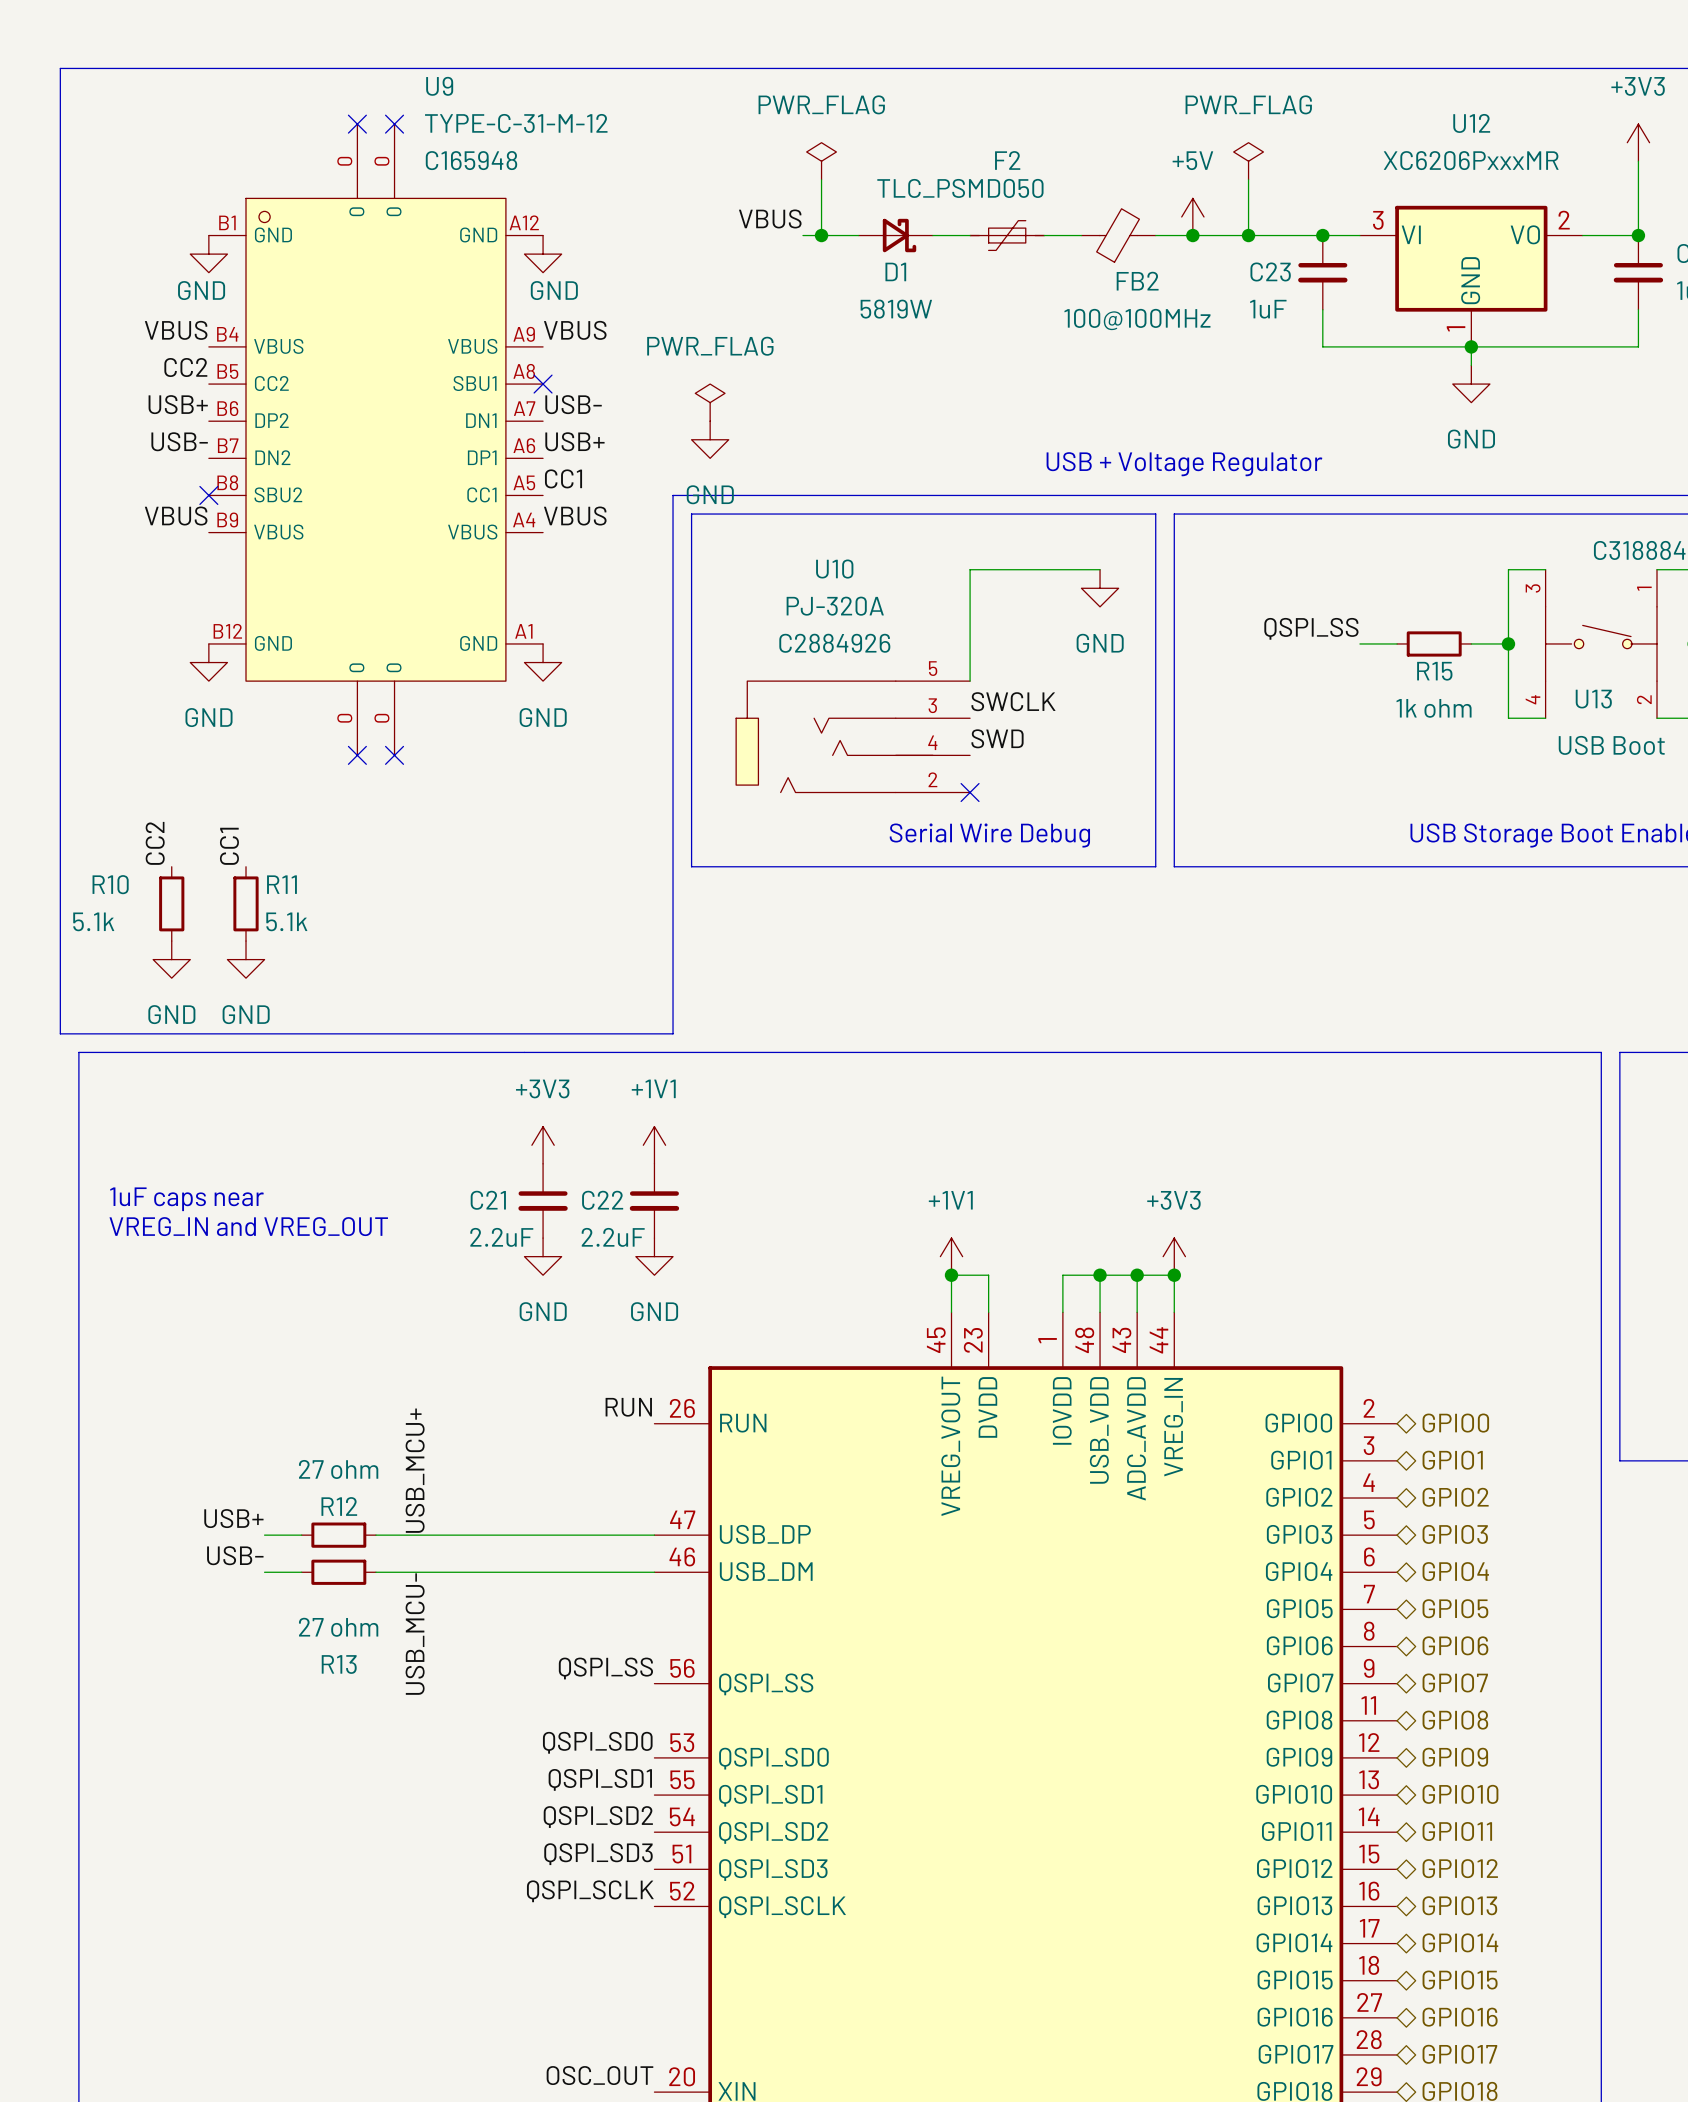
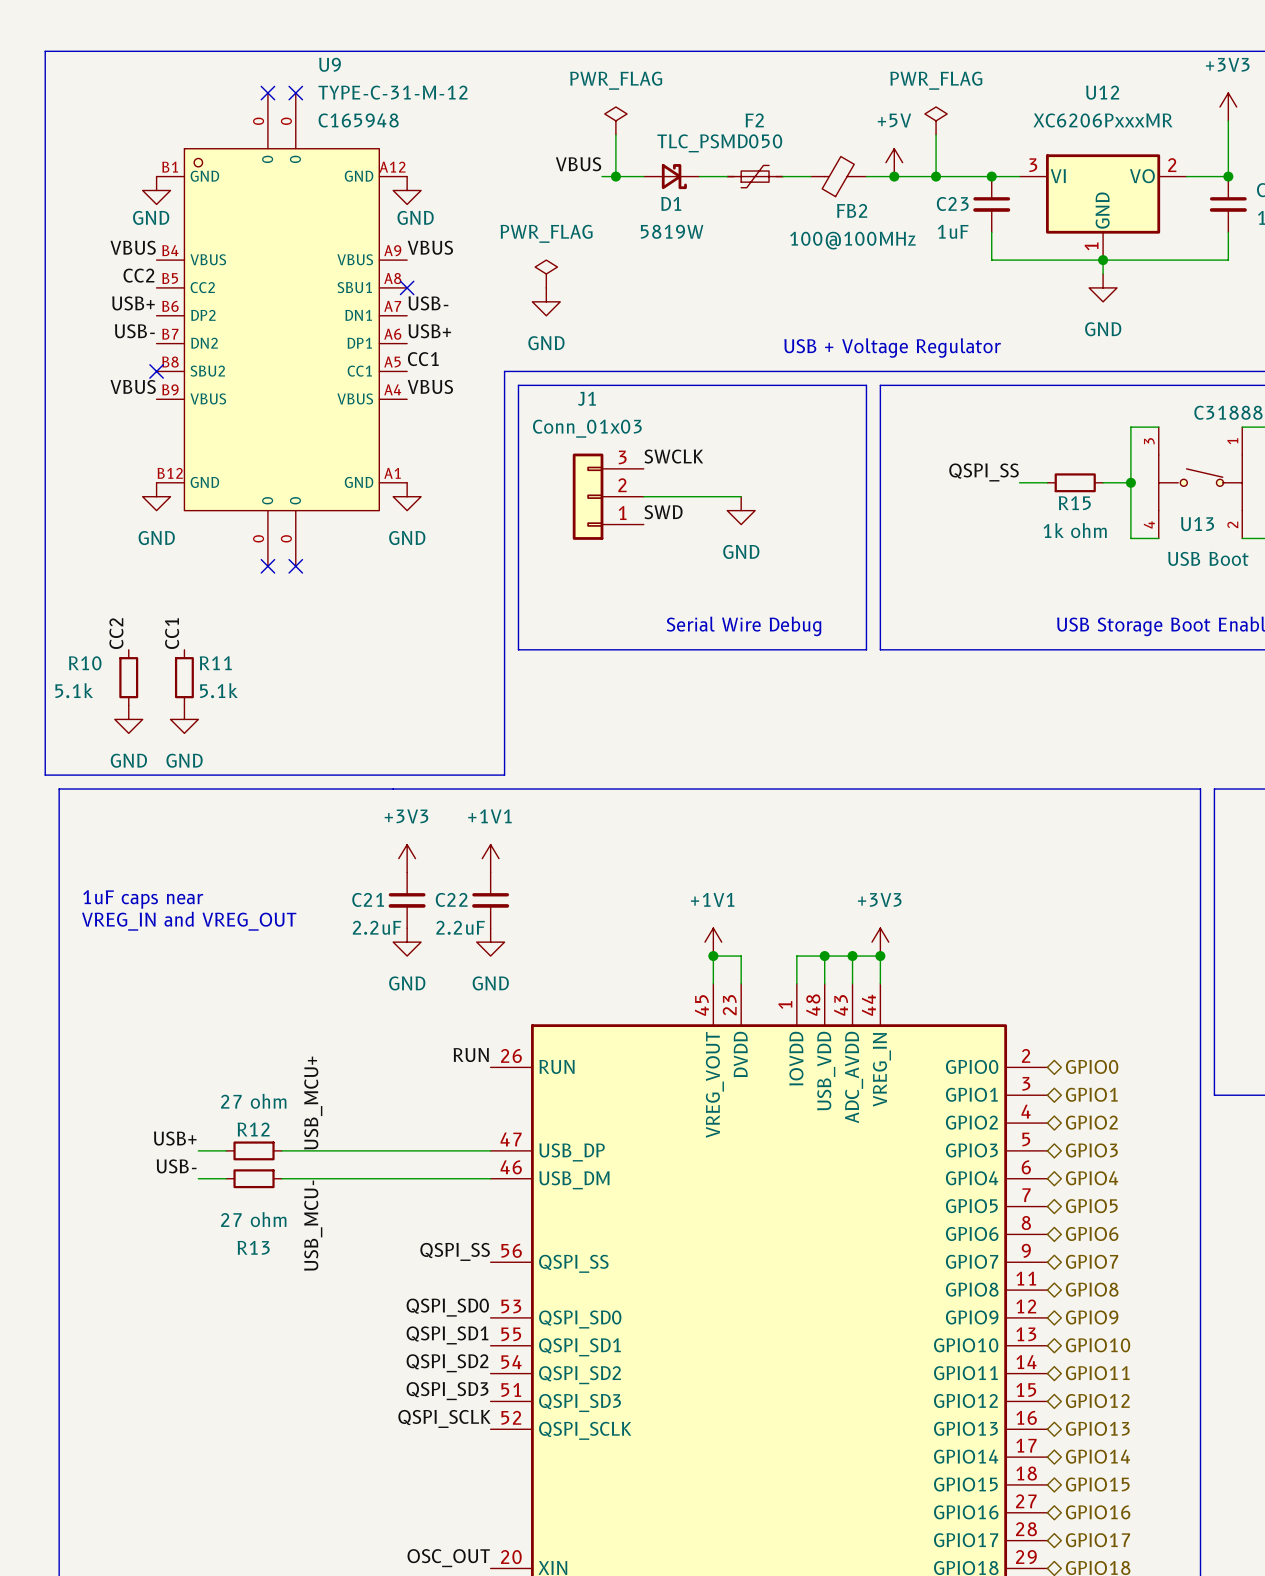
power symbol position: PWR_FLAG (710, 402) -> PWR_FLAG (546, 274)
power symbol position: GND (710, 439) -> GND (546, 301)
wire: (1100, 569) (970, 569) (970, 681) -> none
power symbol position: GND (1100, 588) -> GND (741, 510)
J1: none -> Conn_01x03 (608, 496)
wire: none -> (643, 496) (741, 496)
label position: SWCLK (1013, 701) -> SWCLK (673, 456)
U10: PJ-320A (853, 736) -> none
label position: SWD (997, 738) -> SWD (663, 512)
no-connect mark: (970, 792) -> none

